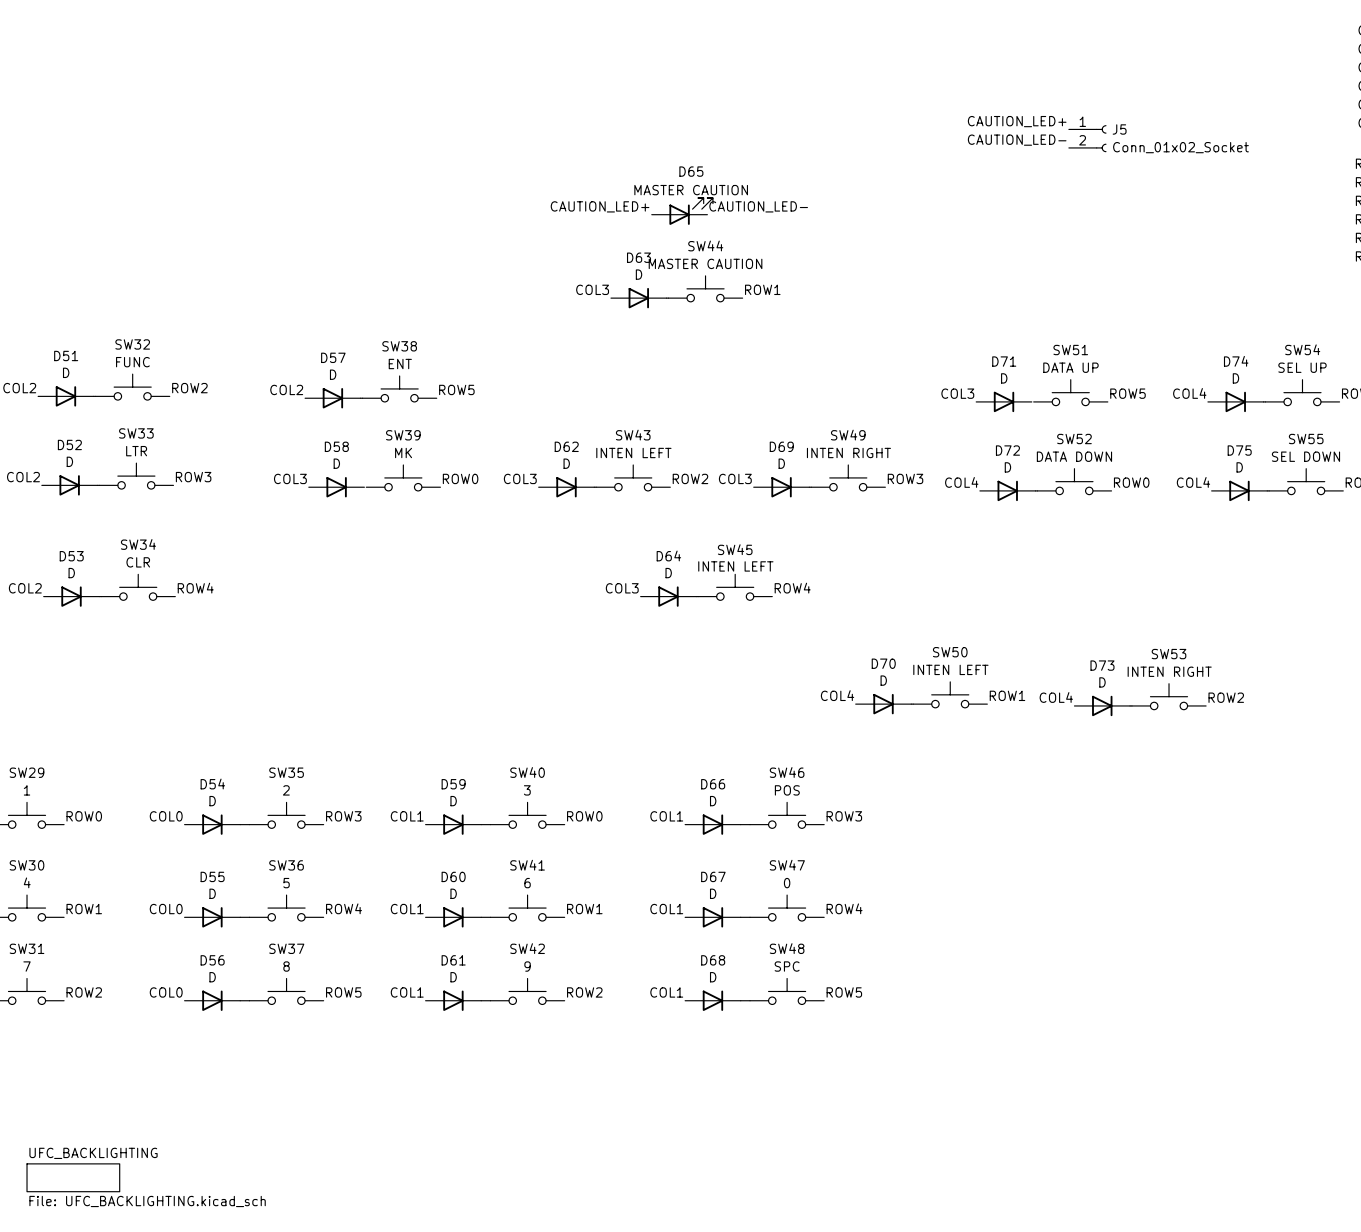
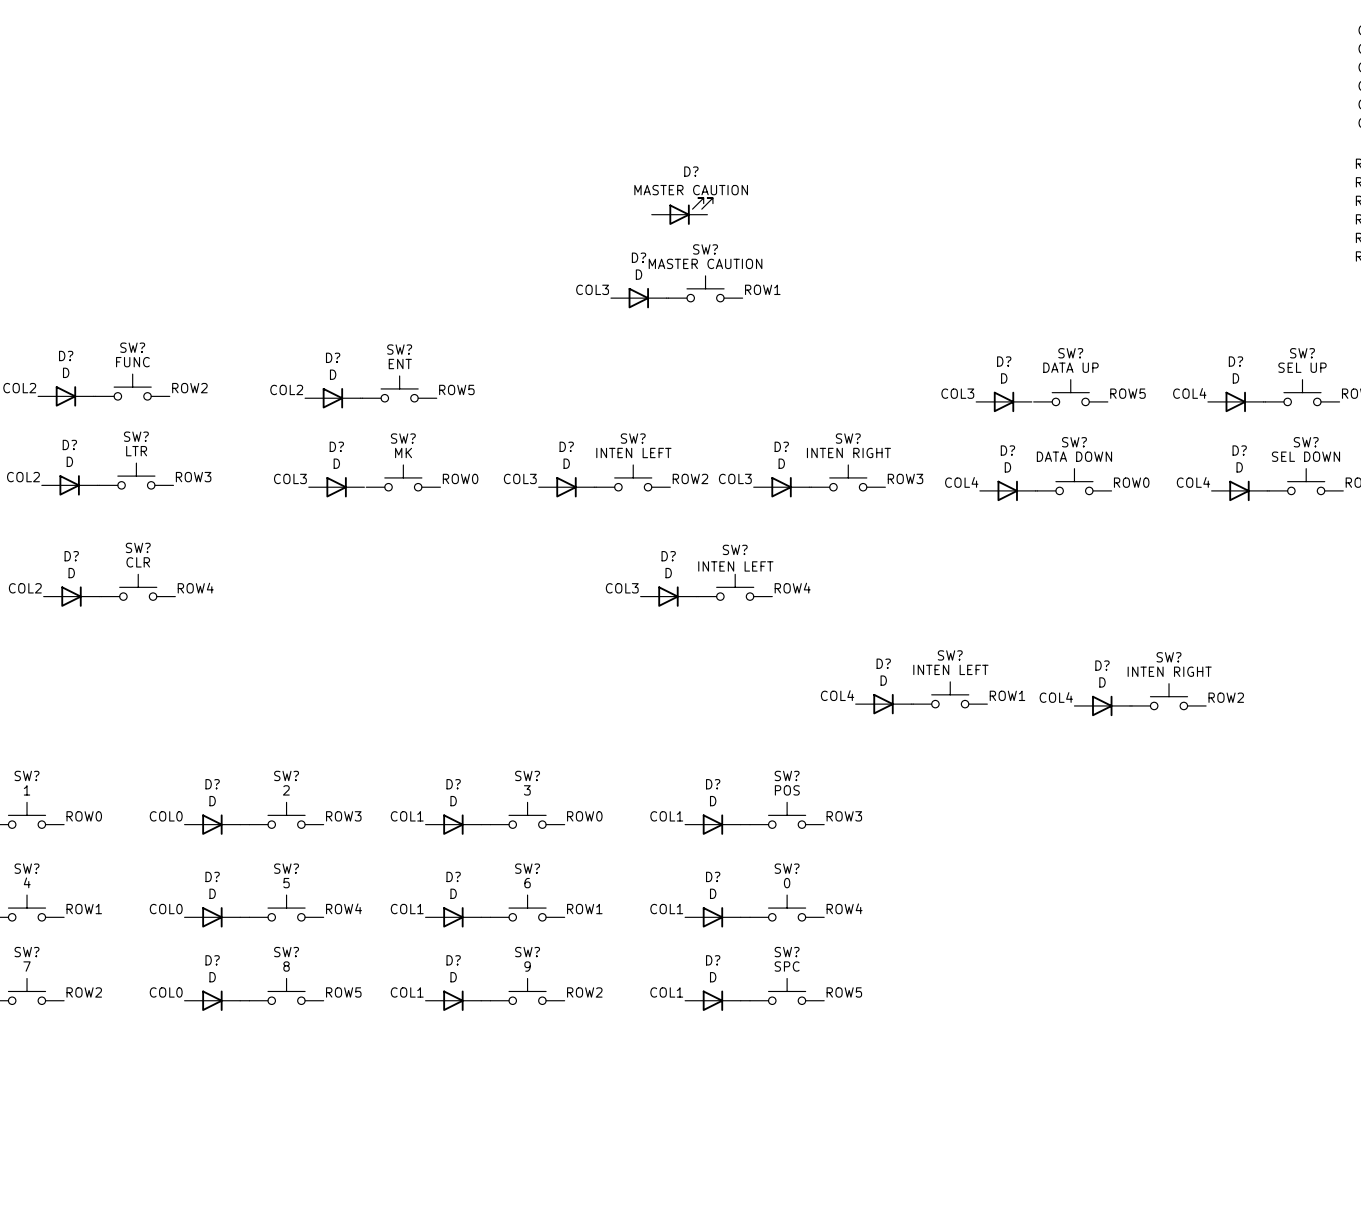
label: CAUTION_LED+ (1017, 121) -> none
J5: Conn_01x02_Socket (1087, 138) -> none
label: CAUTION_LED- (1017, 140) -> none
D65 name: D65 (691, 171) -> D? (691, 171)
label: CAUTION_LED+ (600, 206) -> none
label: CAUTION_LED- (758, 206) -> none
SW44 name: SW44 (705, 245) -> SW? (705, 249)
D63 name: D63 (639, 257) -> D? (639, 257)
SW32 name: SW32 (132, 344) -> SW? (132, 347)
SW38 name: SW38 (399, 346) -> SW? (399, 349)
SW54 name: SW54 (1302, 349) -> SW? (1302, 353)
SW51 name: SW51 (1070, 350) -> SW? (1070, 353)
D51 name: D51 (66, 355) -> D? (66, 355)
D57 name: D57 (333, 357) -> D? (333, 357)
D71 name: D71 (1004, 361) -> D? (1004, 361)
D74 name: D74 (1236, 361) -> D? (1235, 361)
SW33 name: SW33 (136, 433) -> SW? (136, 436)
SW39 name: SW39 (403, 435) -> SW? (403, 438)
SW43 name: SW43 (633, 435) -> SW? (633, 438)
SW49 name: SW49 (848, 435) -> SW? (848, 438)
SW52 name: SW52 (1074, 439) -> SW? (1074, 442)
SW55 name: SW55 (1306, 439) -> SW? (1306, 442)
D52 name: D52 (69, 444) -> D? (69, 444)
D58 name: D58 (336, 446) -> D? (336, 446)
D62 name: D62 (566, 446) -> D? (566, 446)
D69 name: D69 (781, 446) -> D? (781, 446)
D72 name: D72 (1007, 450) -> D? (1007, 450)
D75 name: D75 (1239, 450) -> D? (1239, 450)
SW34 name: SW34 (138, 544) -> SW? (138, 547)
SW45 name: SW45 (735, 549) -> SW? (735, 549)
D64 name: D64 (668, 555) -> D? (668, 556)
D53 name: D53 (71, 556) -> D? (71, 556)
SW50 name: SW50 (950, 652) -> SW? (950, 655)
SW53 name: SW53 (1169, 654) -> SW? (1169, 657)
D70 name: D70 (883, 663) -> D? (883, 663)
D73 name: D73 (1102, 665) -> D? (1102, 665)
SW29 name: SW29 (27, 772) -> SW? (27, 775)
SW35 name: SW35 (286, 772) -> SW? (286, 775)
SW40 name: SW40 (527, 772) -> SW? (527, 775)
SW46 name: SW46 (787, 772) -> SW? (787, 775)
D54 name: D54 (212, 784) -> D? (212, 784)
D59 name: D59 (453, 784) -> D? (453, 784)
D66 name: D66 (713, 784) -> D? (713, 784)
SW30 name: SW30 (27, 865) -> SW? (27, 868)
SW36 name: SW36 (286, 865) -> SW? (286, 868)
SW41 name: SW41 (527, 865) -> SW? (527, 868)
SW47 name: SW47 (787, 865) -> SW? (787, 868)
D55 name: D55 (212, 876) -> D? (212, 876)
D60 name: D60 (453, 876) -> D? (453, 876)
D67 name: D67 (713, 876) -> D? (713, 876)
SW31 name: SW31 (27, 948) -> SW? (27, 952)
SW37 name: SW37 (286, 948) -> SW? (286, 952)
SW42 name: SW42 (527, 948) -> SW? (527, 952)
SW48 name: SW48 (787, 948) -> SW? (787, 952)
D56 name: D56 (212, 960) -> D? (212, 960)
D61 name: D61 (453, 960) -> D? (453, 960)
D68 name: D68 (713, 960) -> D? (713, 960)
sheet UFC_BACKLIGHTING: File: UFC_BACKLIGHTING.kicad_sch (73, 1177) -> none

